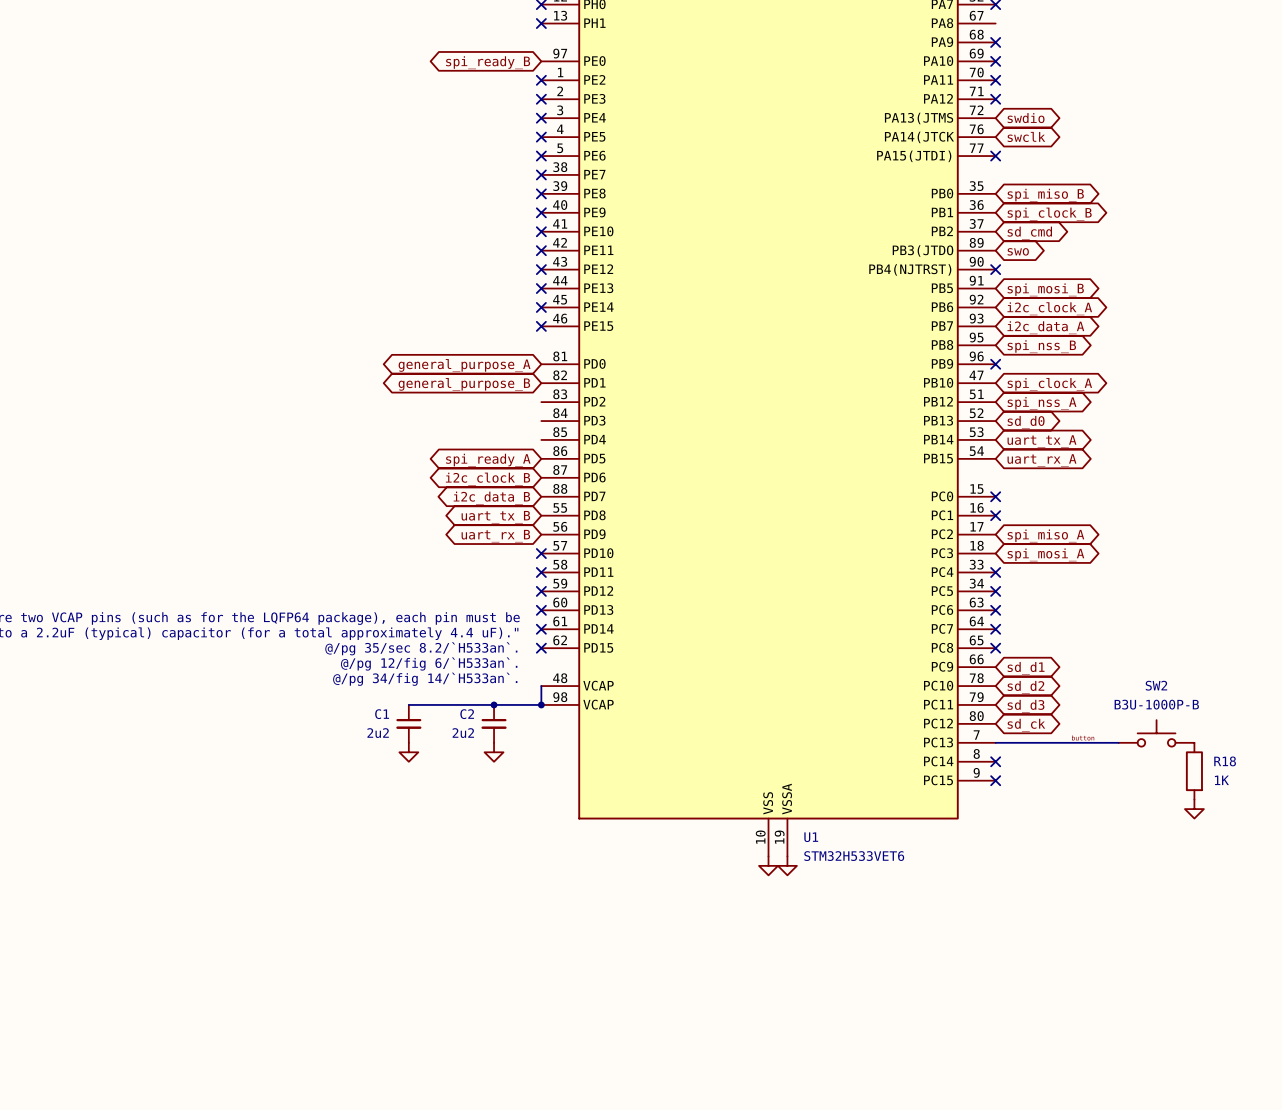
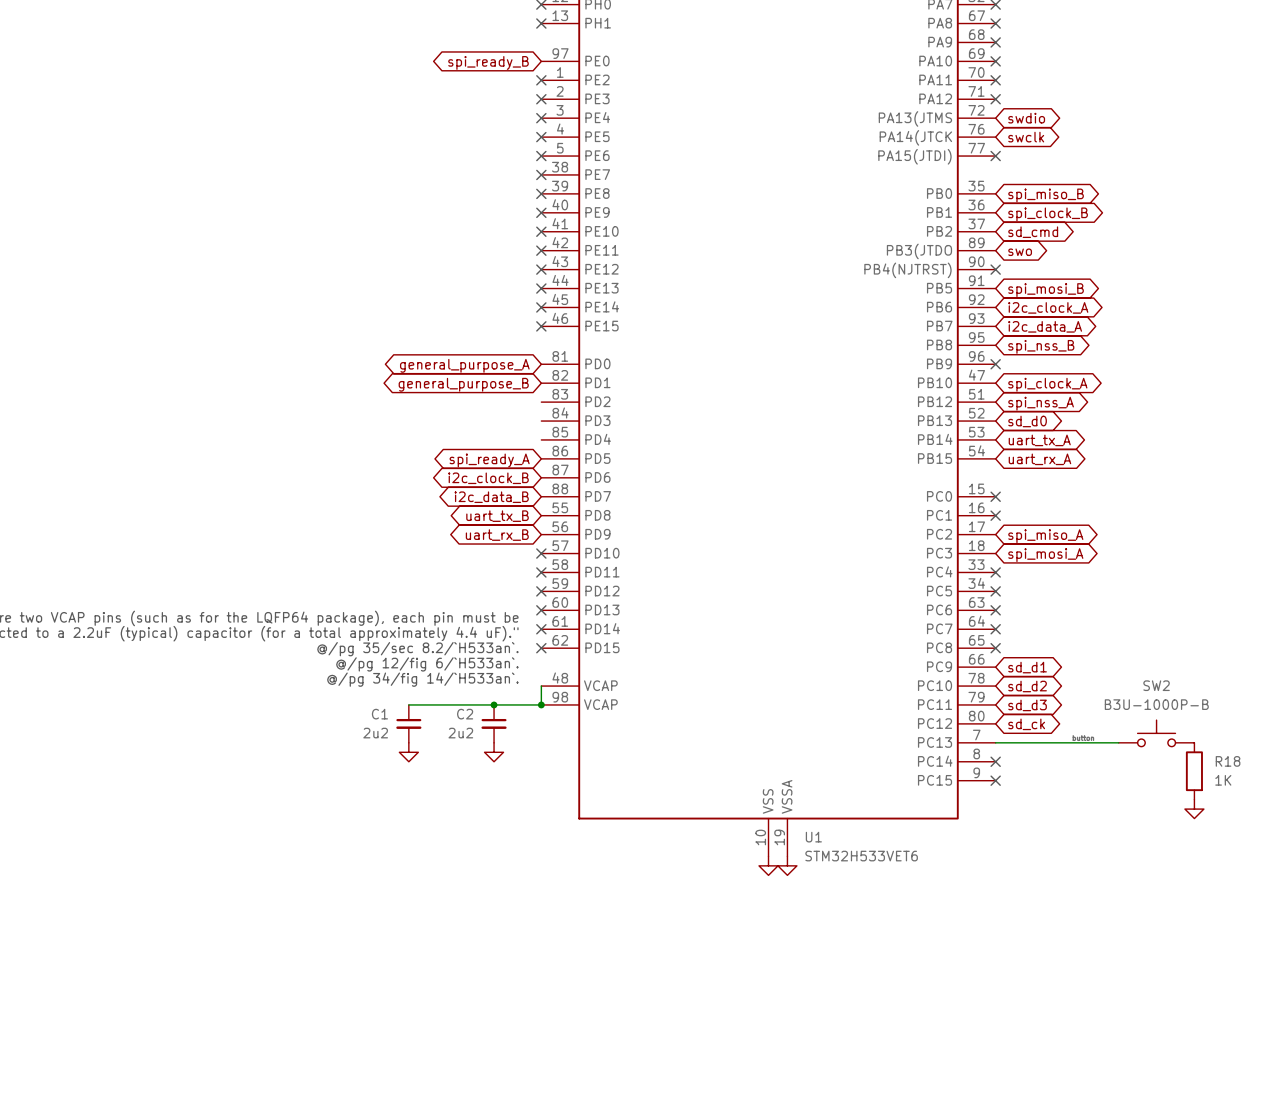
no-connect mark: none -> (995, 23)

